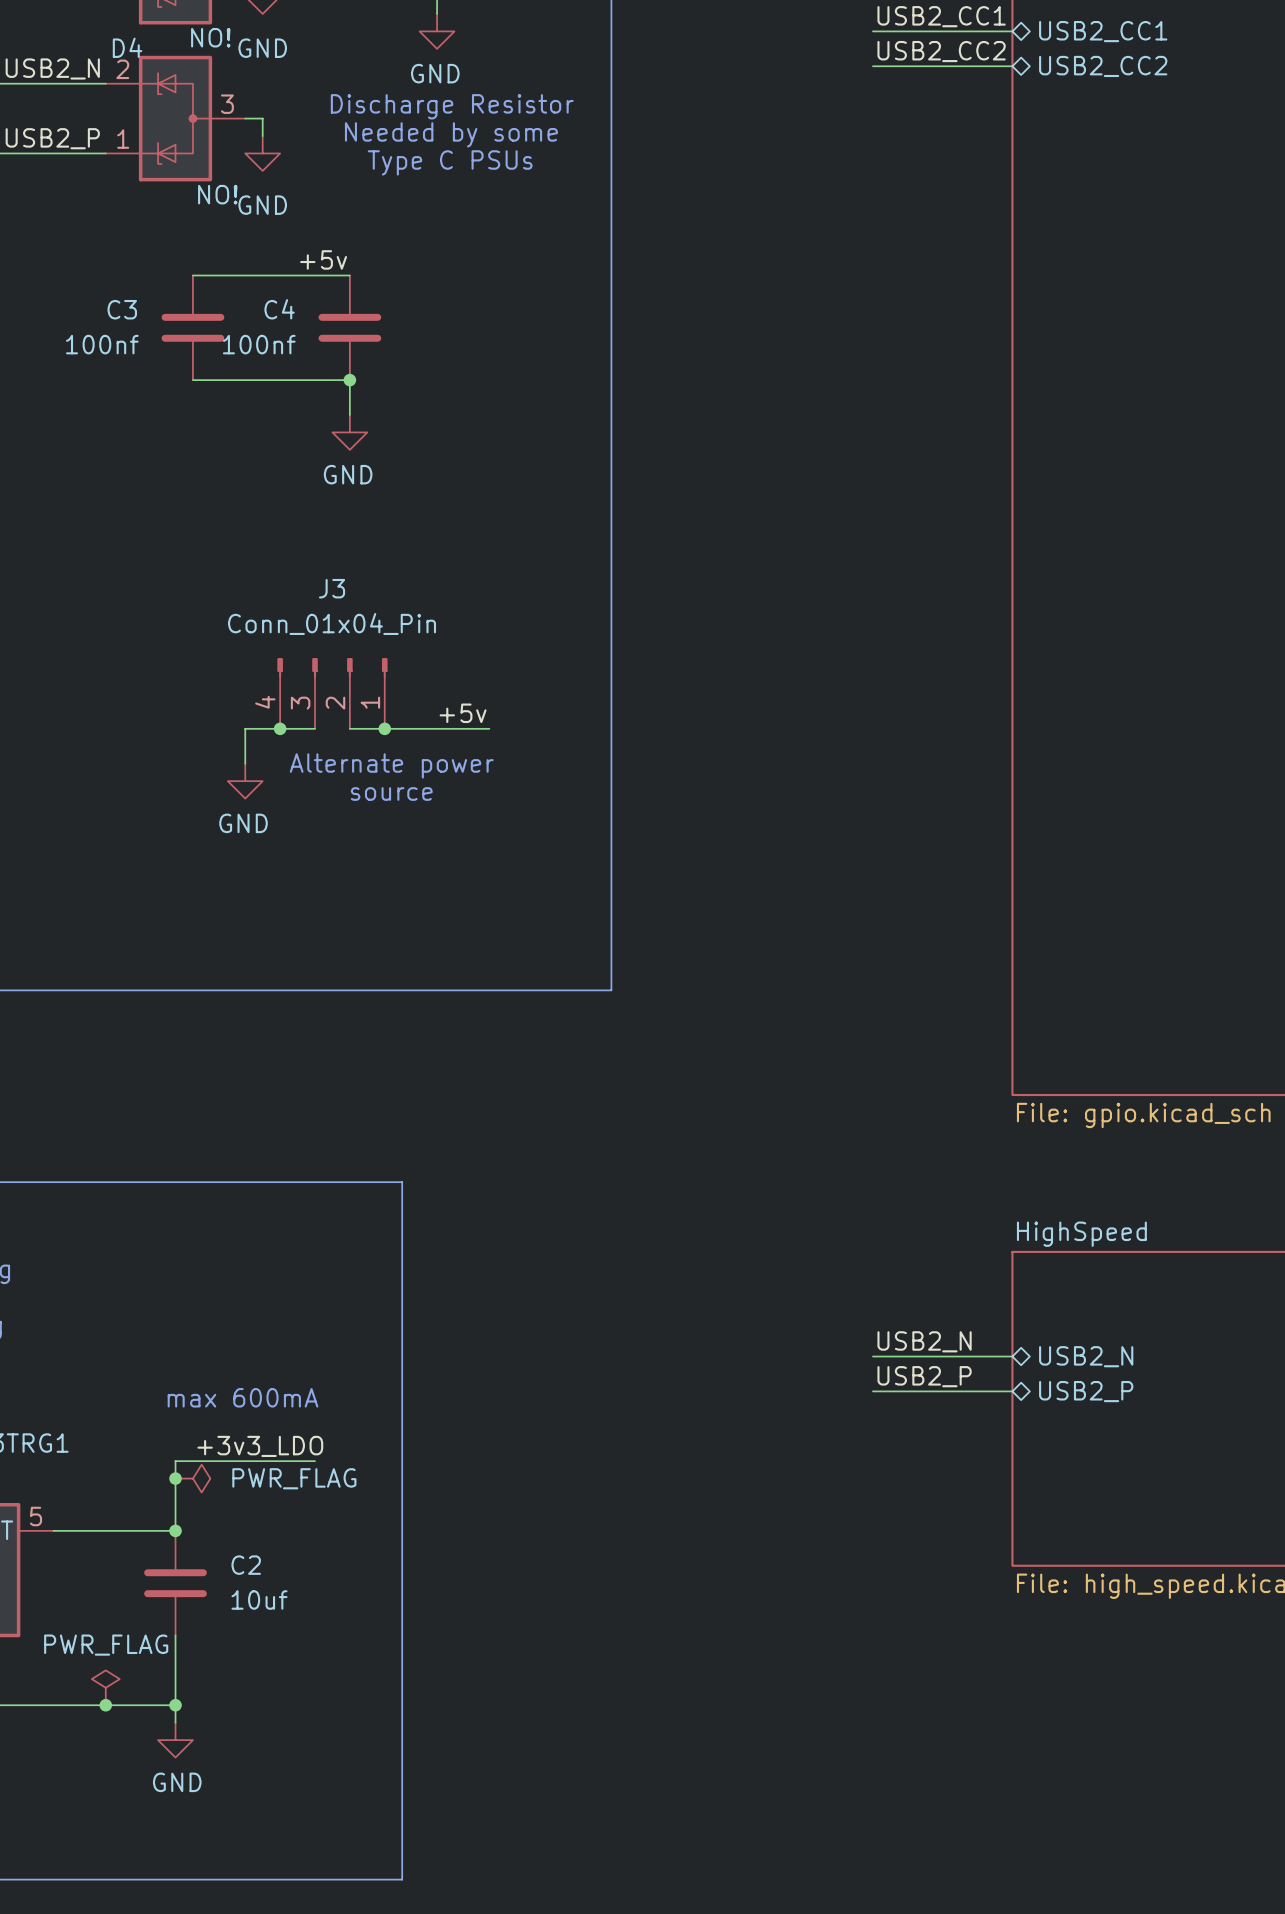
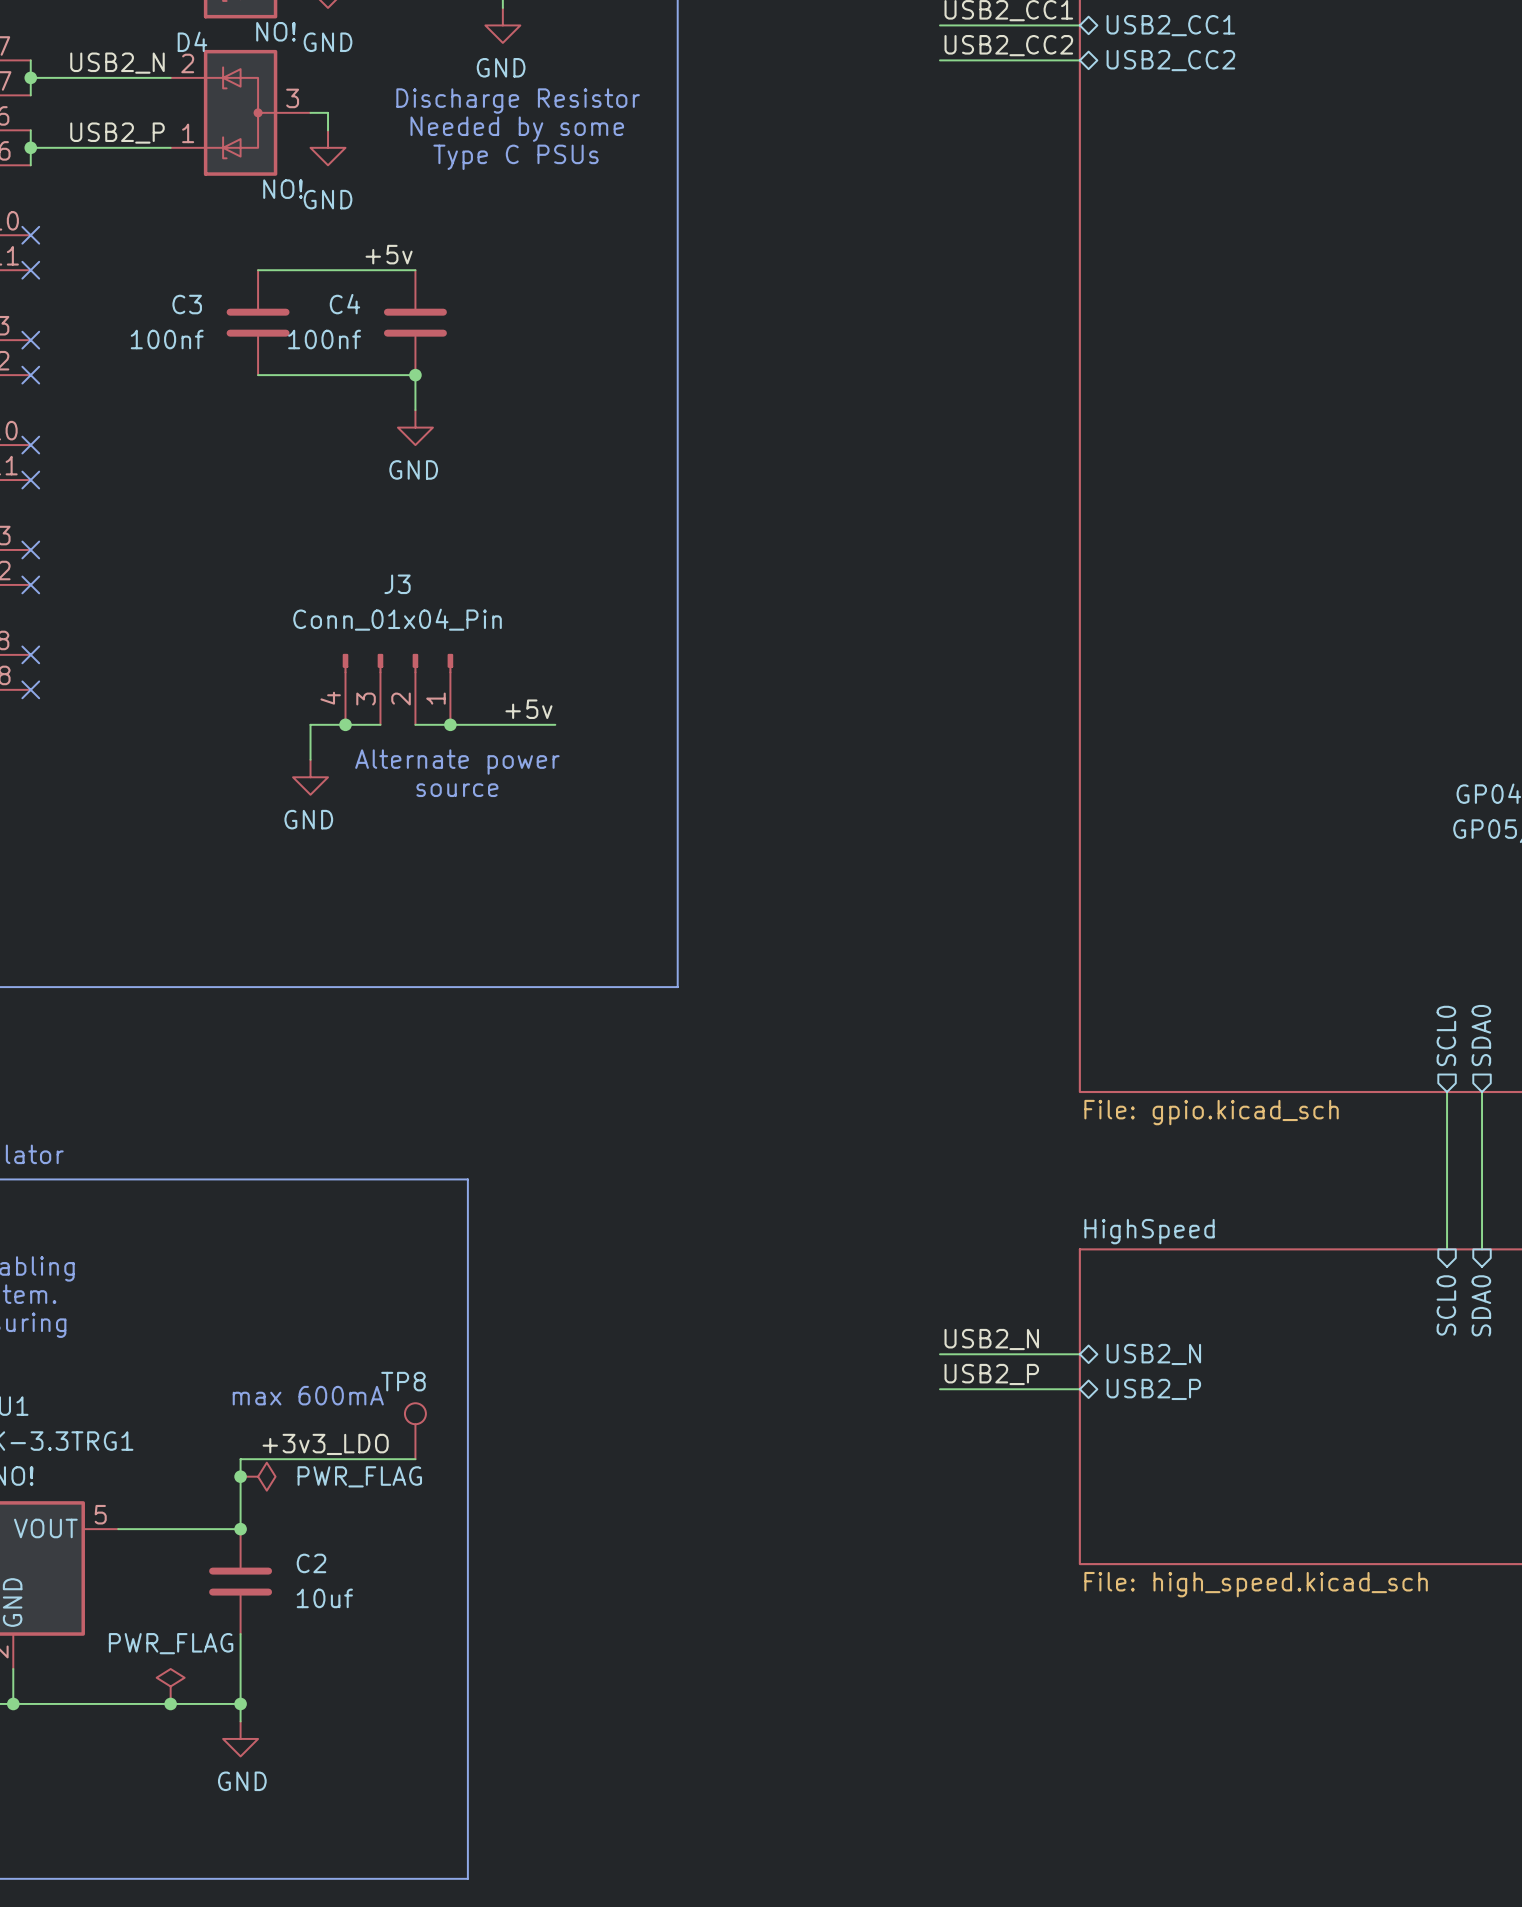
TP8: none -> (415, 1431)
wire: none -> (380, 1459) (415, 1459)

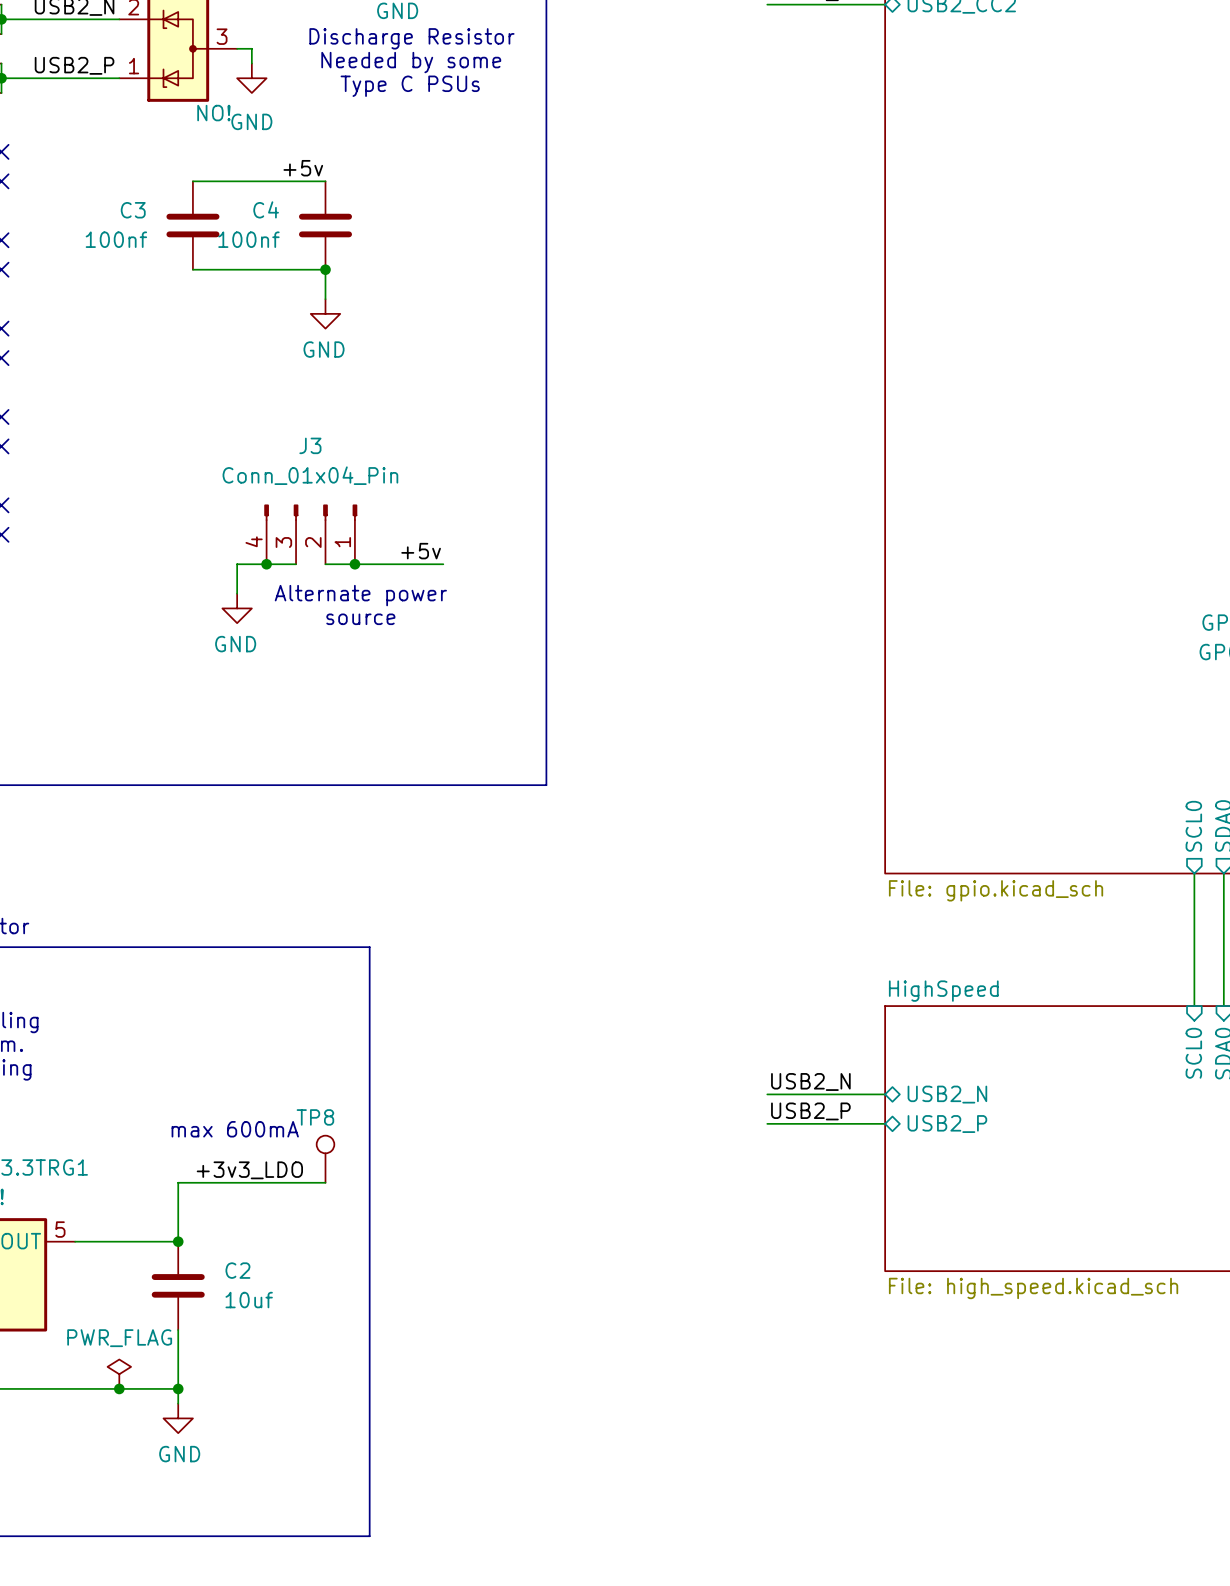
junction: (240, 1476) -> none
power symbol: PWR_FLAG (258, 1476) -> none

